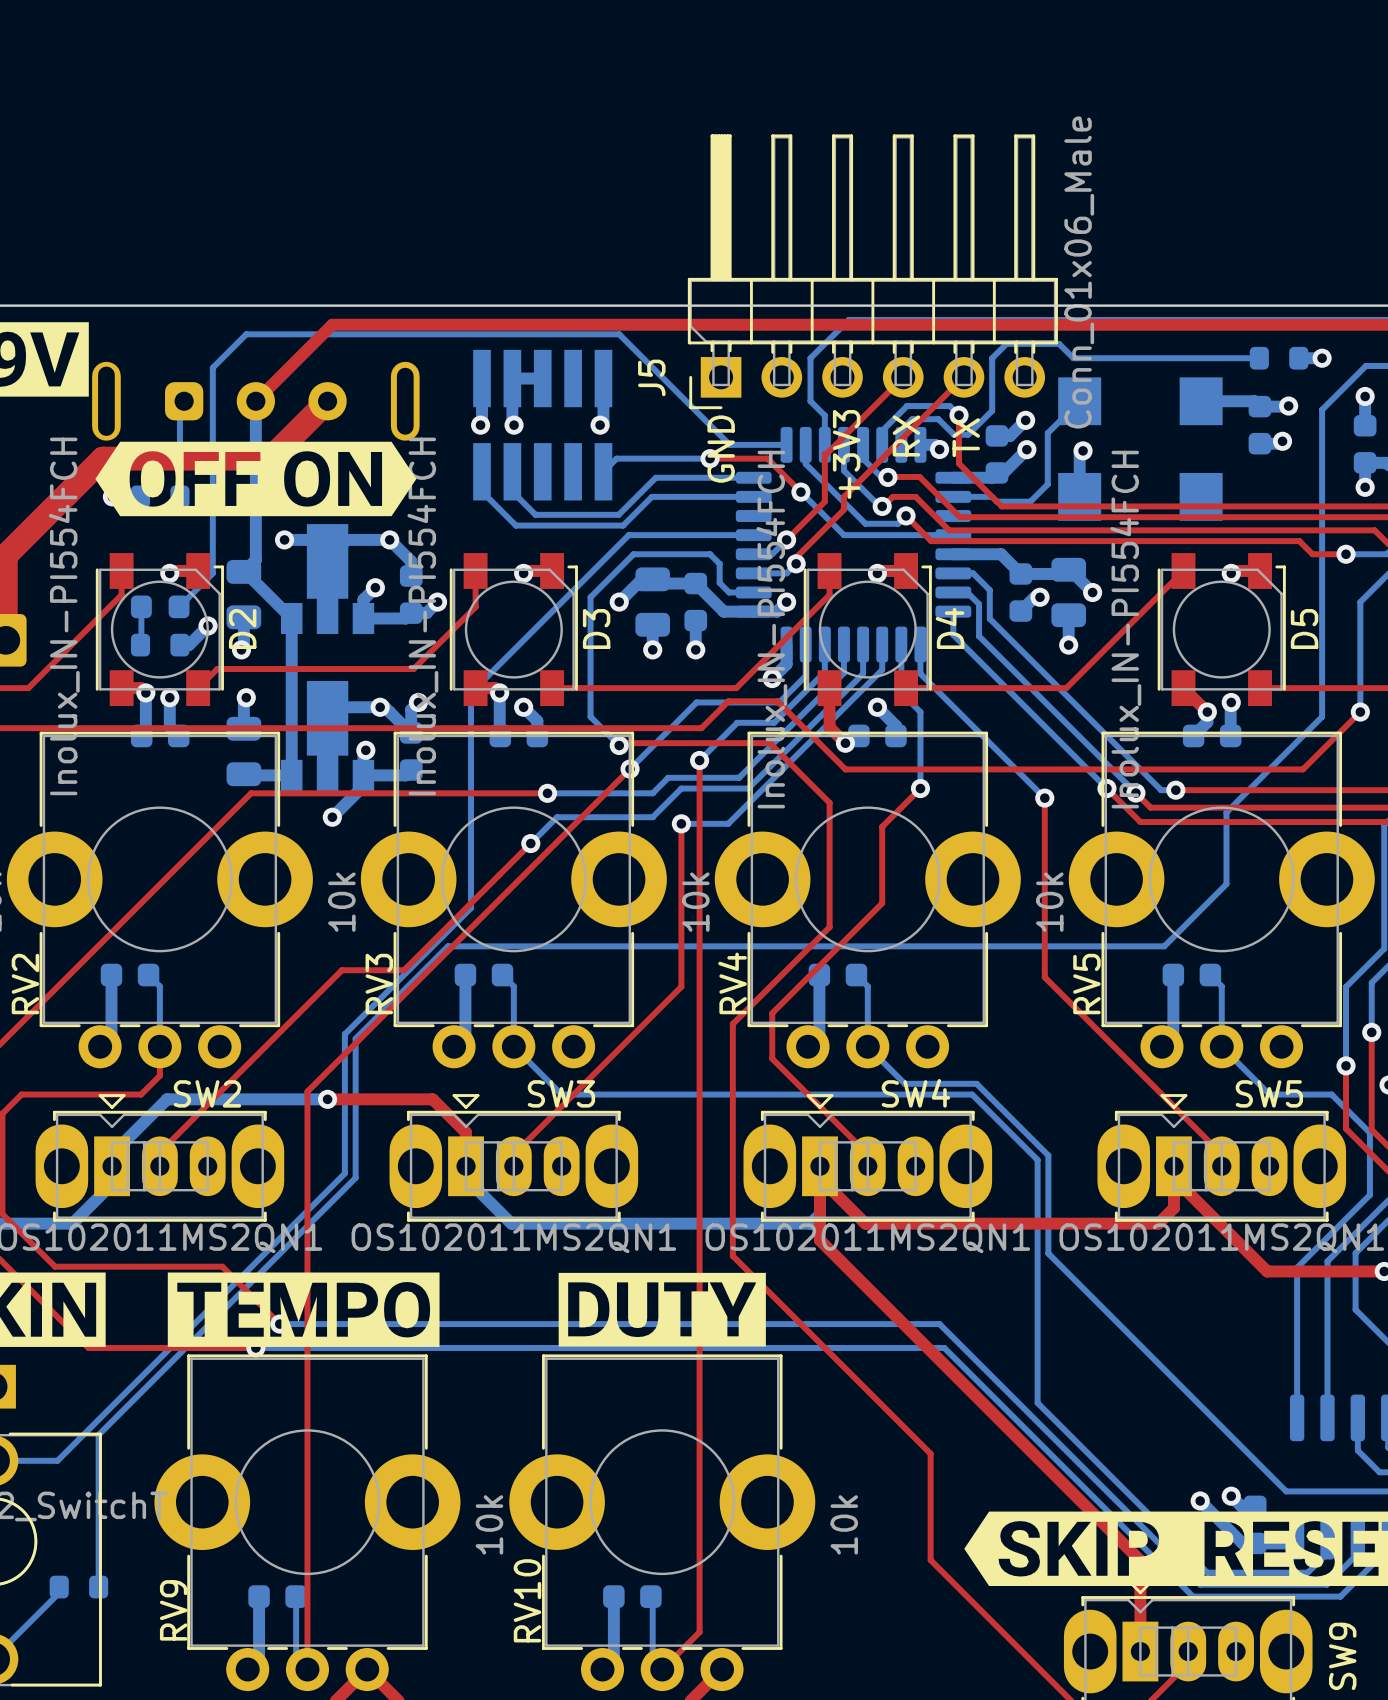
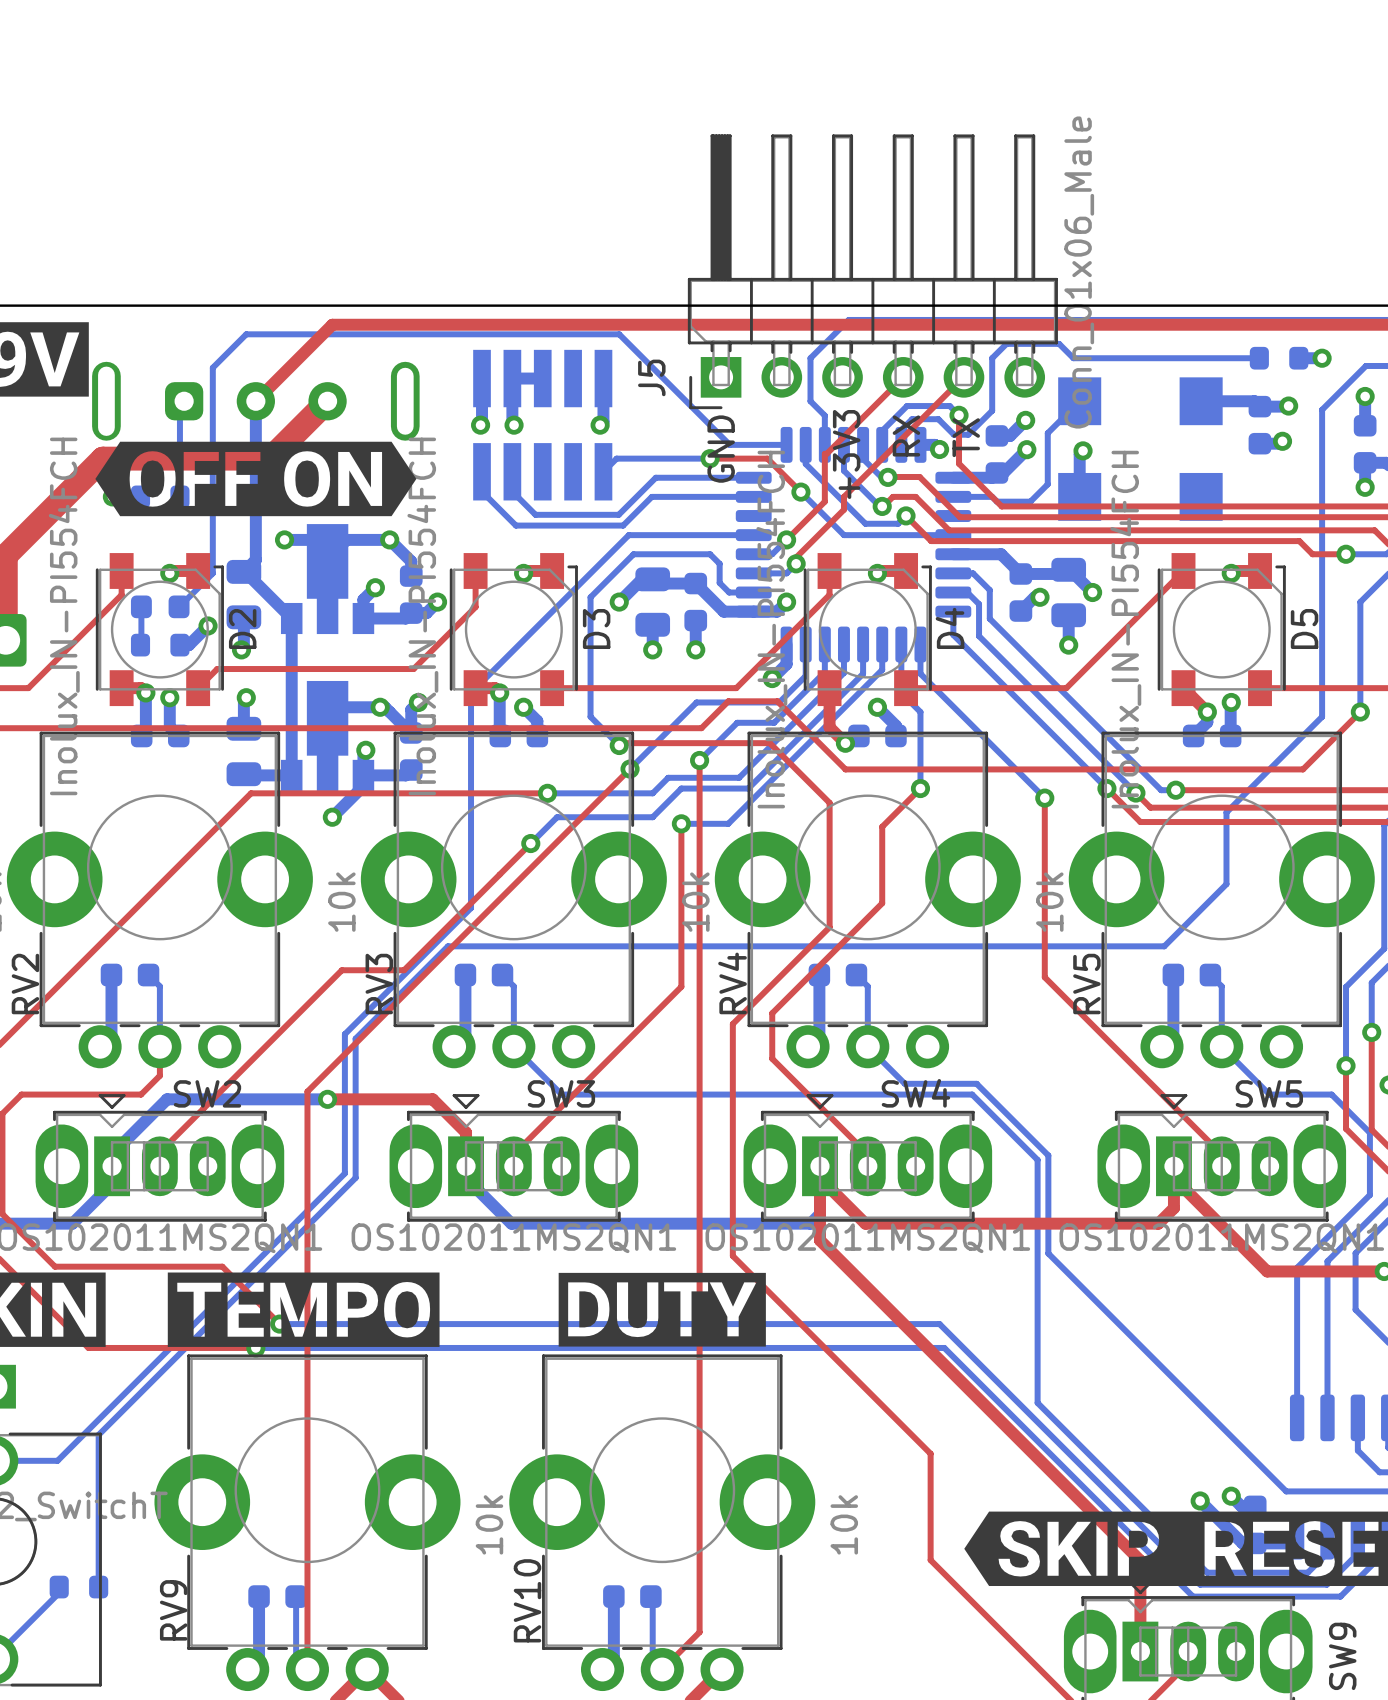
RV2 footprint: [6, 731, 313, 1069] -> [6, 731, 313, 1069]
RV3 footprint: [360, 731, 667, 1069] -> [360, 731, 667, 1069]
RV4 footprint: [714, 731, 1021, 1069] -> [714, 731, 1021, 1069]
RV5 footprint: [1068, 731, 1375, 1069] -> [1068, 731, 1375, 1069]
RV9 footprint: [154, 1354, 461, 1692] -> [154, 1354, 461, 1692]
RV10 footprint: [509, 1354, 816, 1692] -> [509, 1354, 816, 1692]

